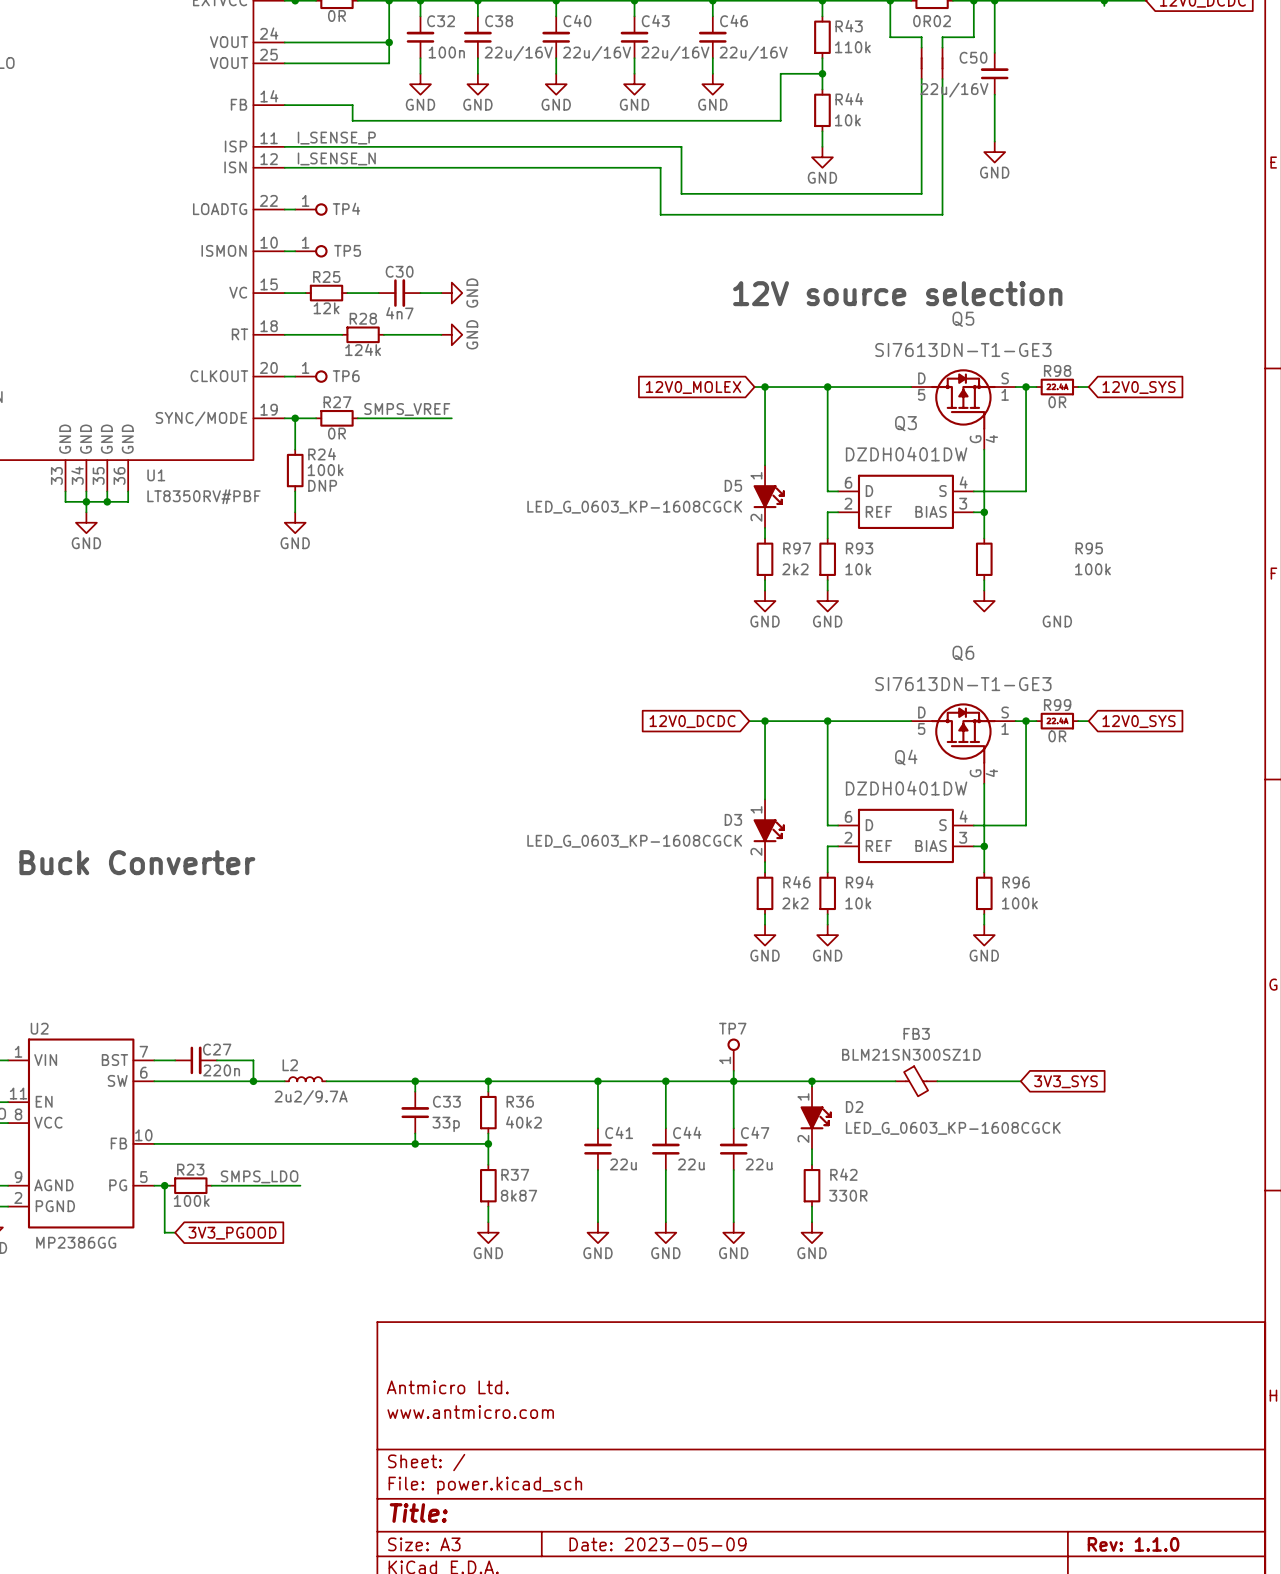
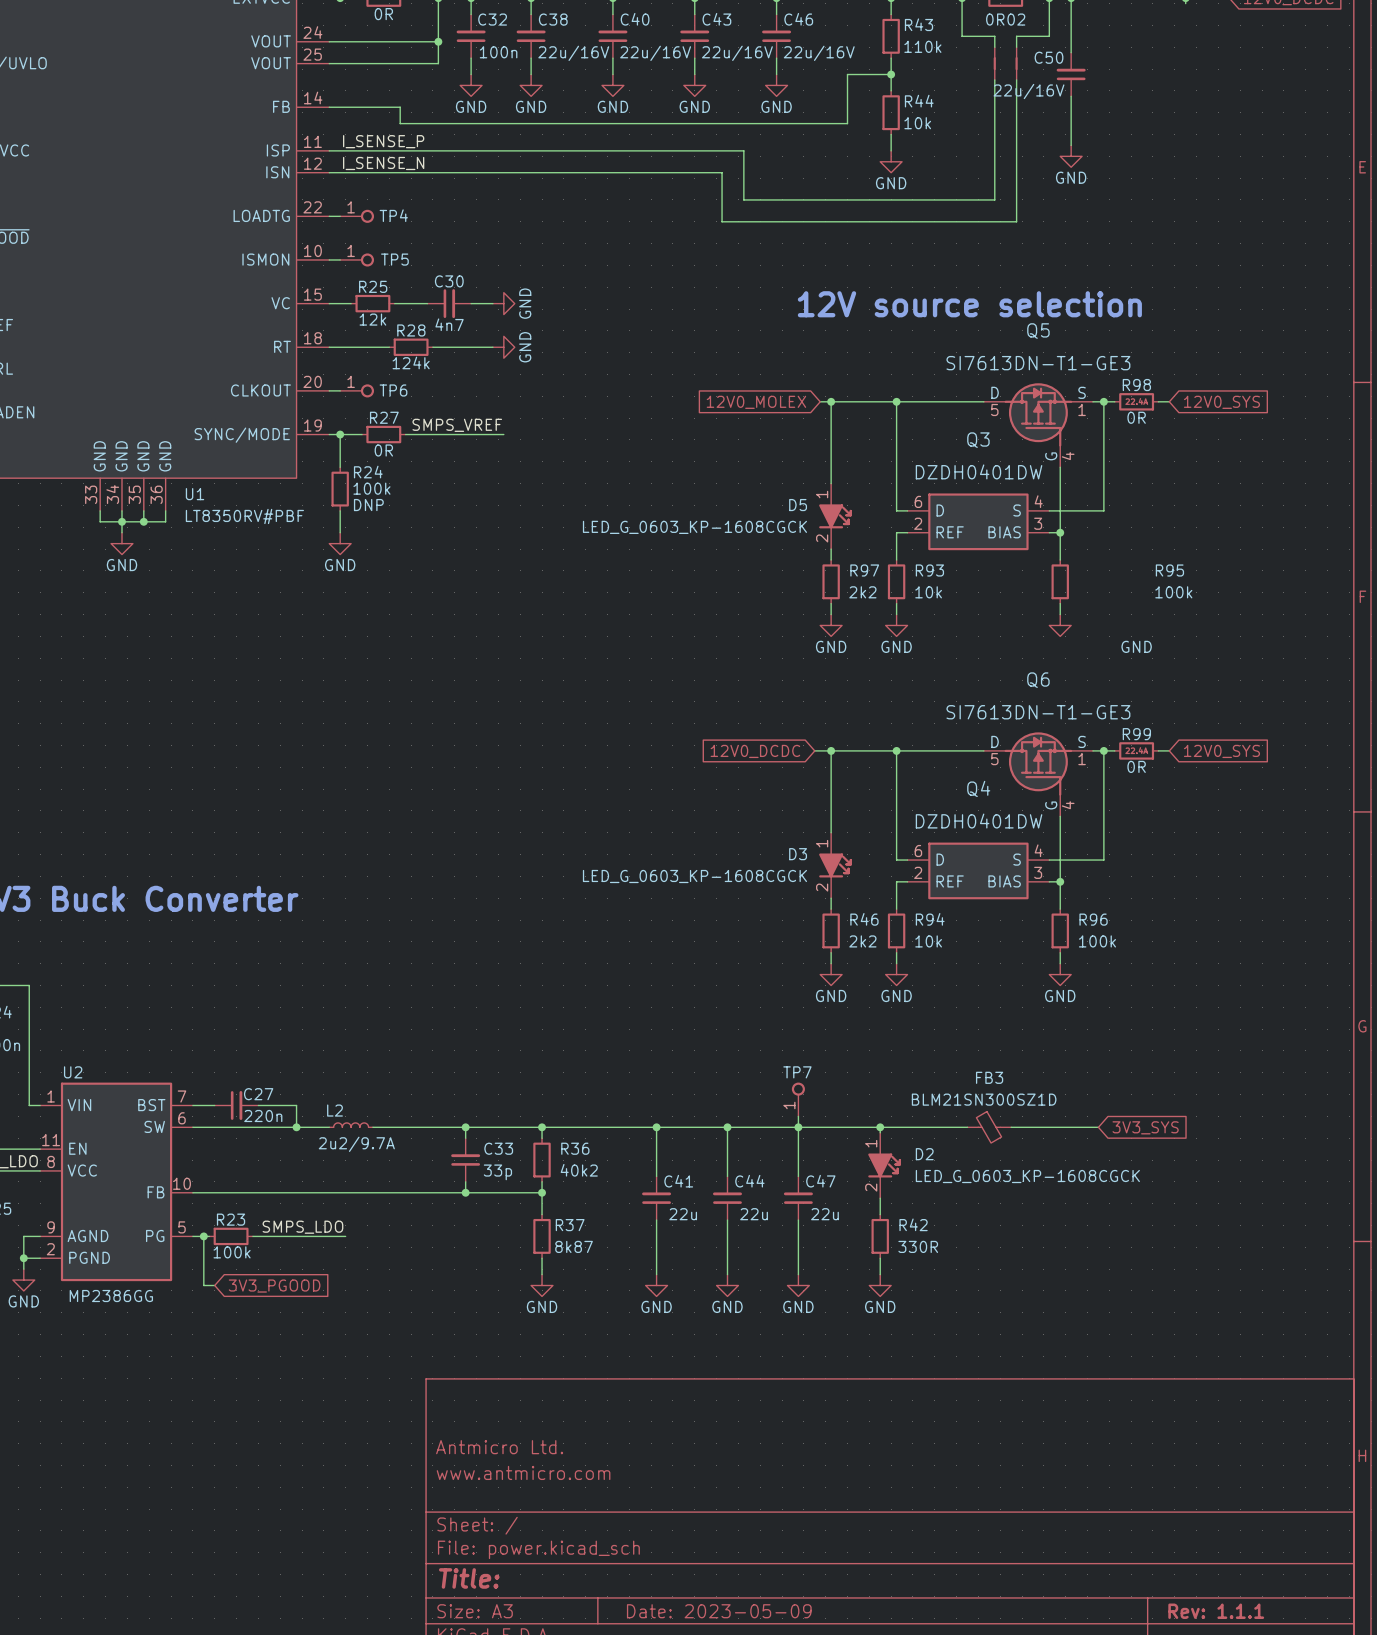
title block: Rev: 1.1.0 (1133, 1544) -> Rev: 1.1.1 (1216, 1611)

